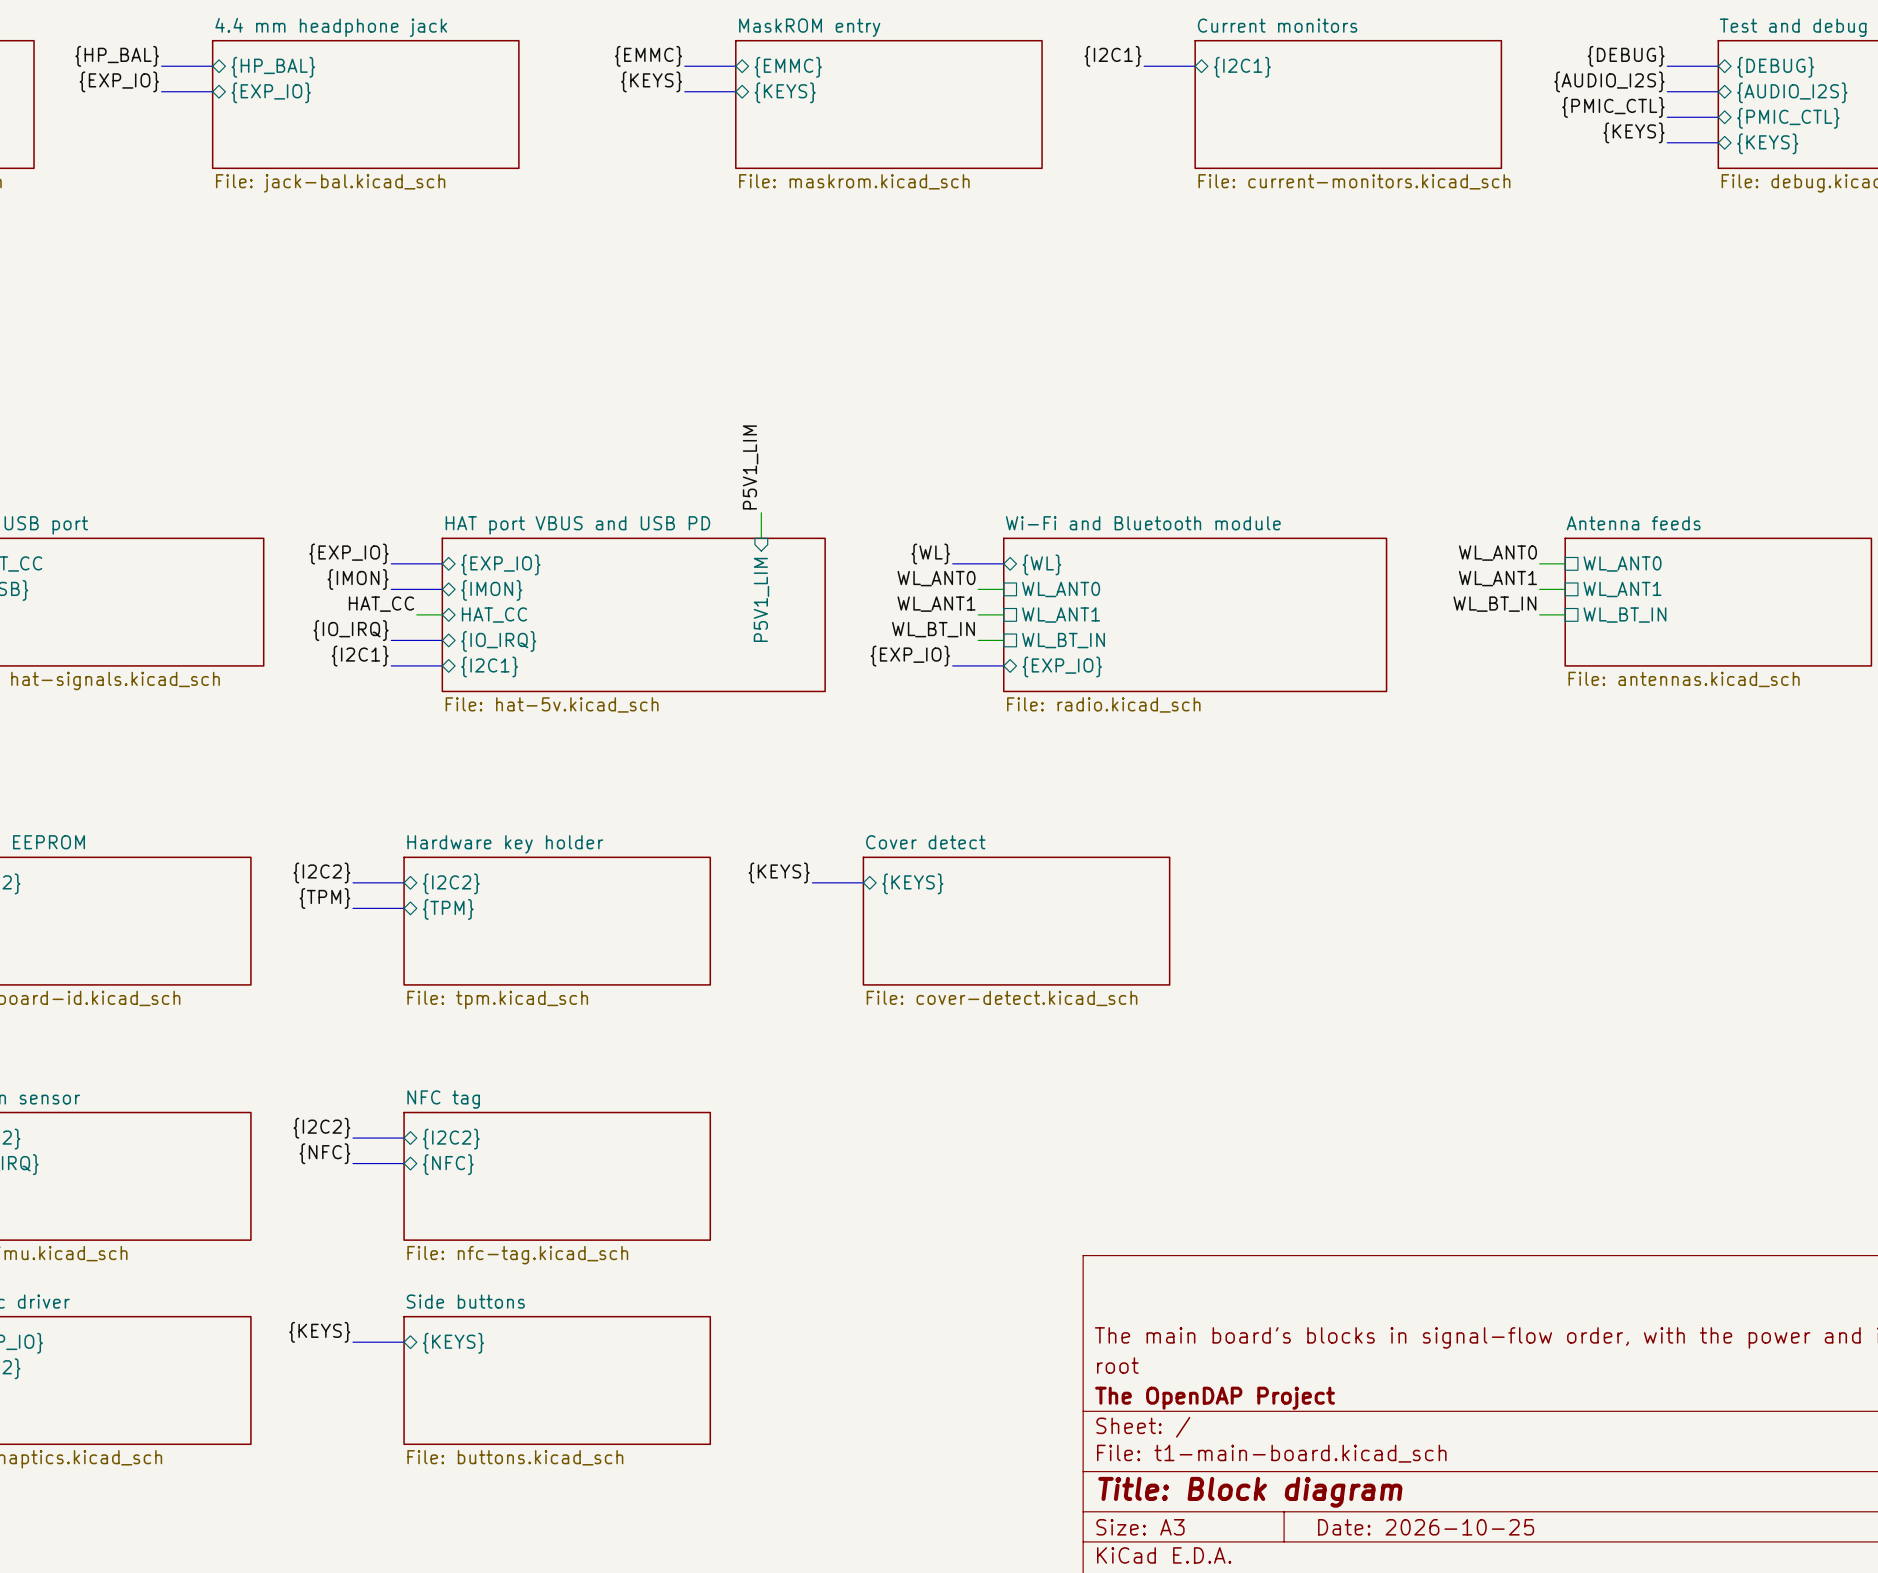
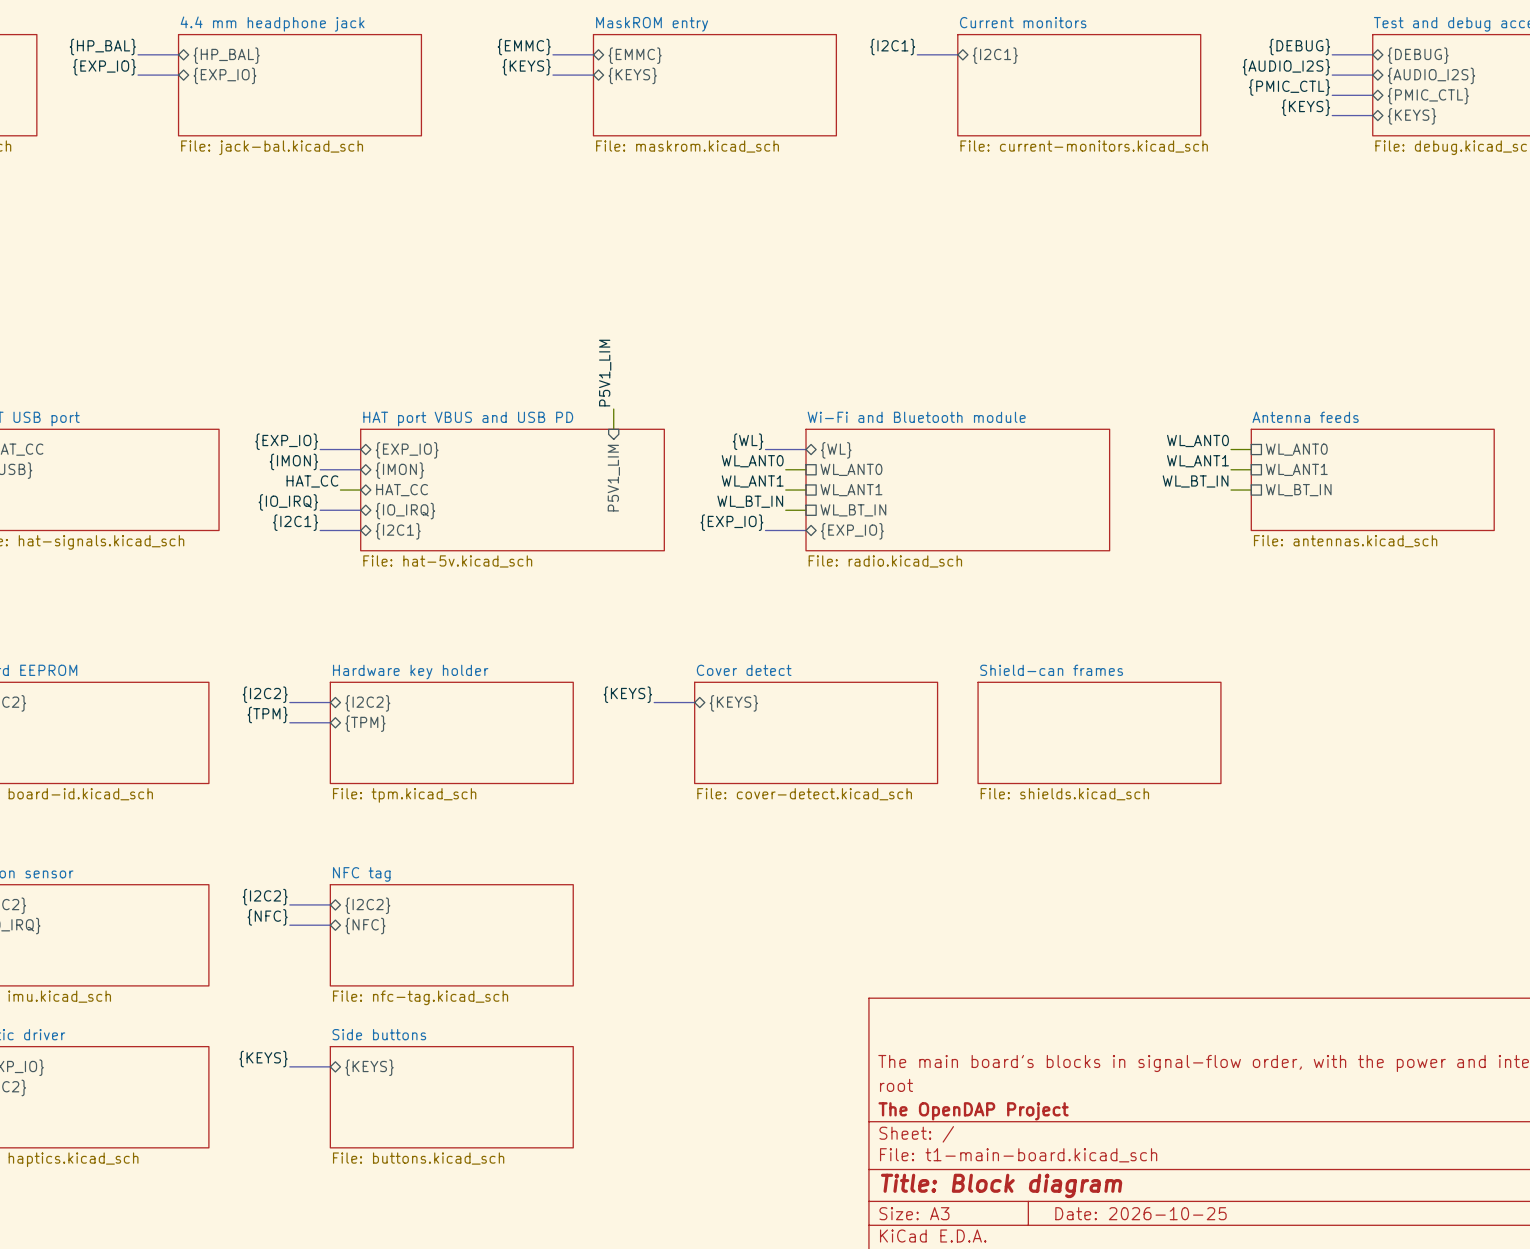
sheet Shield-can frames: none -> File: shields.kicad_sch (1099, 732)

